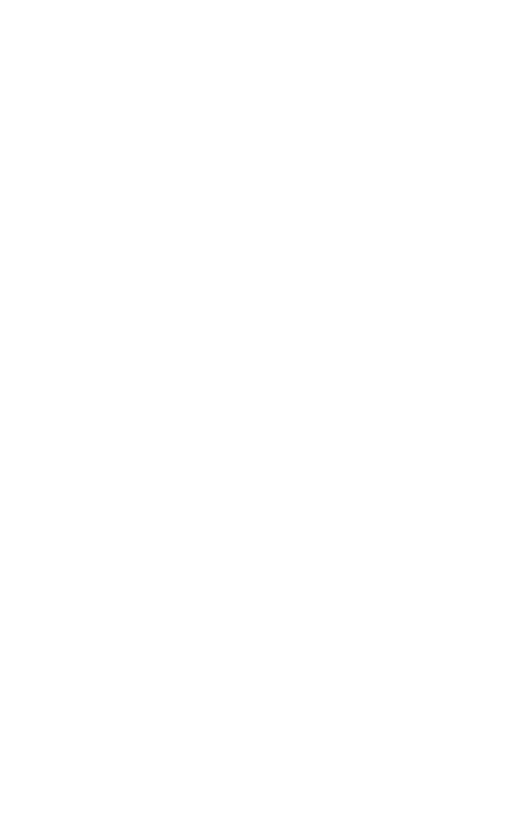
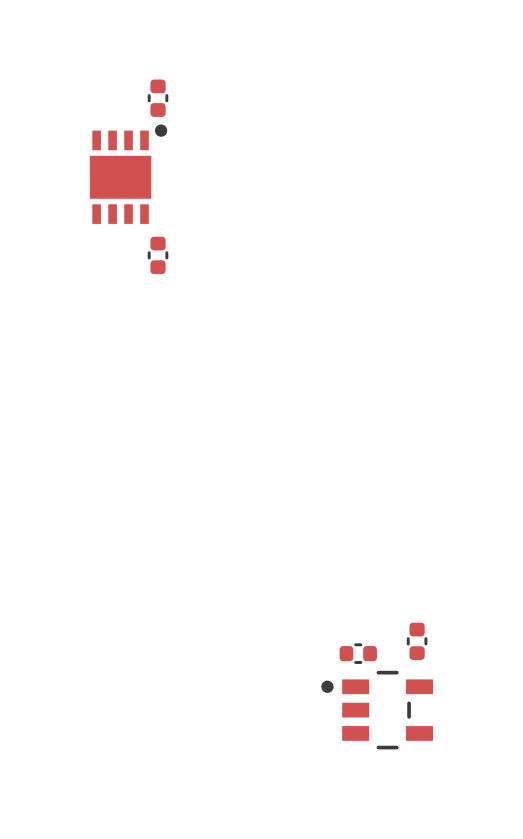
part: none -> (158, 98)
part: none -> (128, 174)
part: none -> (158, 255)
part: none -> (417, 641)
part: none -> (358, 653)
part: none -> (377, 710)

